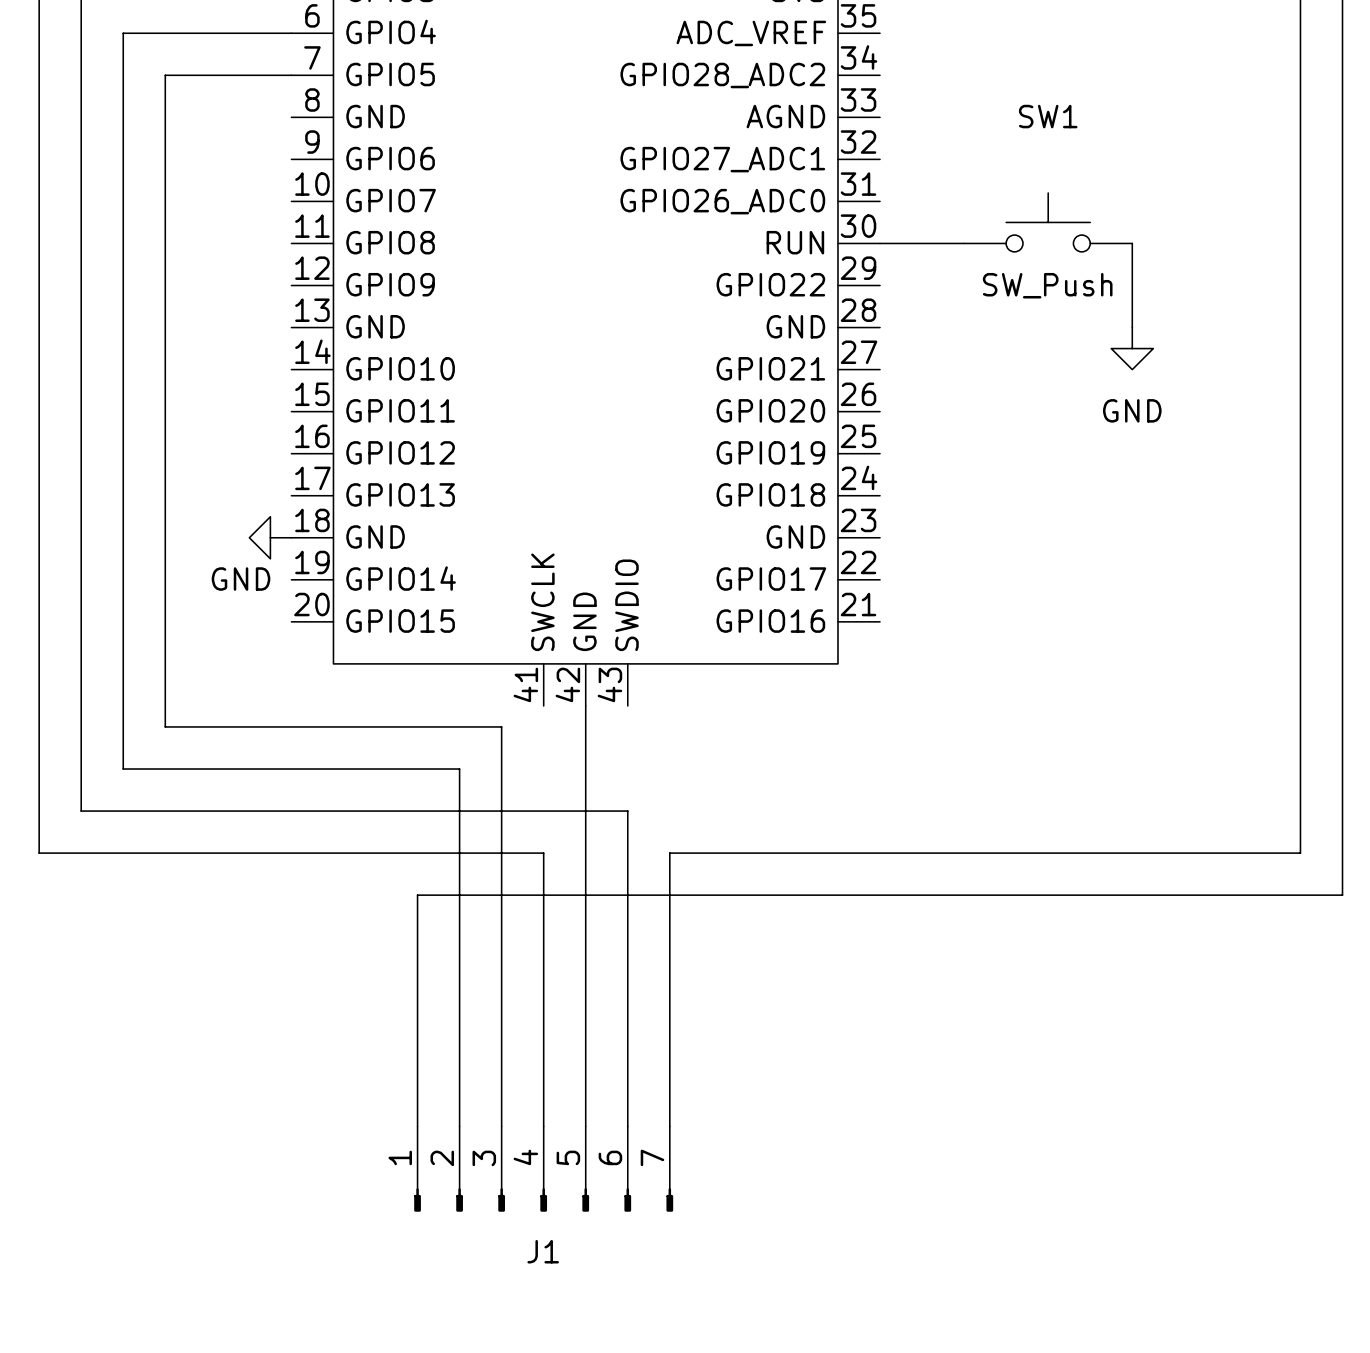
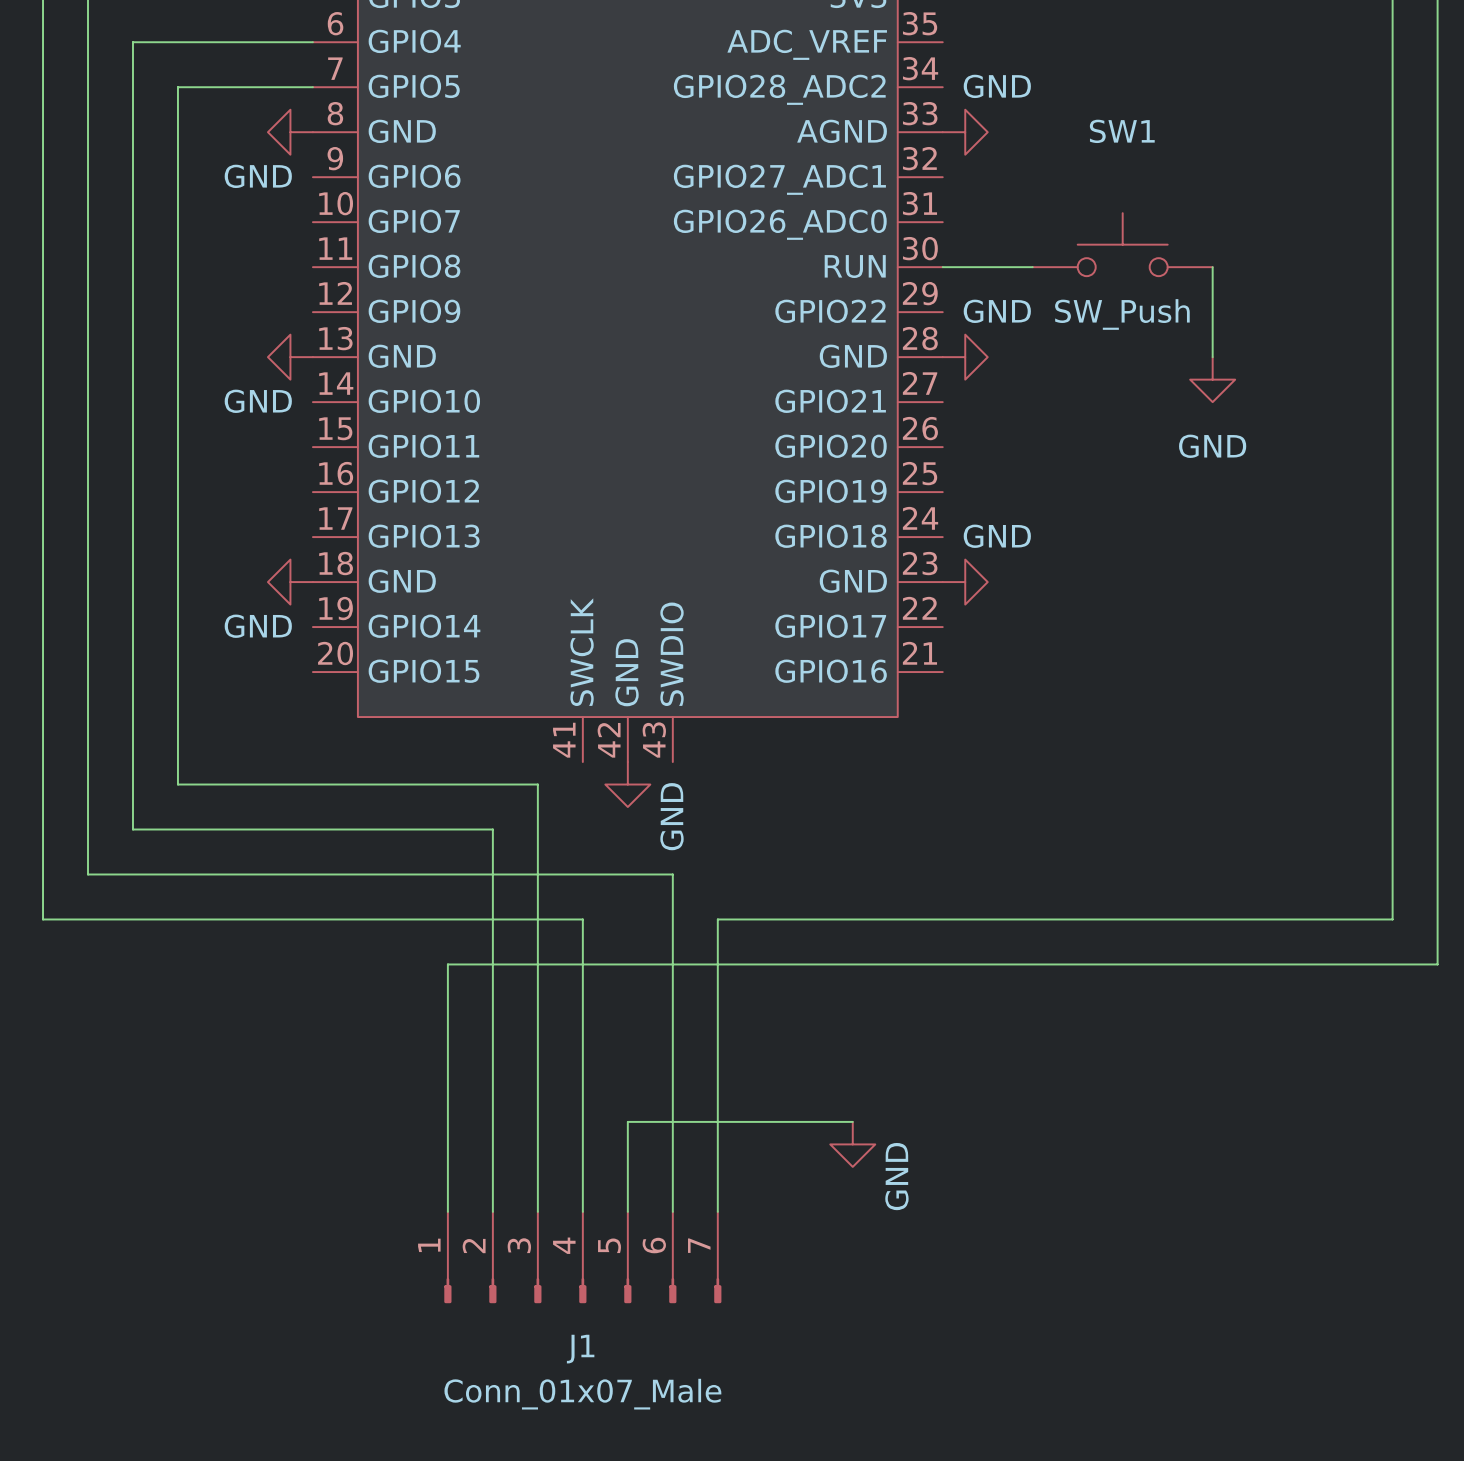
power symbol: none -> GND (290, 132)
power symbol: none -> GND (965, 132)
power symbol: none -> GND (290, 357)
power symbol: none -> GND (965, 357)
power symbol: none -> GND (965, 582)
wire: (585, 705) (585, 1042) -> (852, 1121) (627, 1121)
power symbol: none -> GND (627, 784)
power symbol: none -> GND (852, 1144)
J1 value: none -> Conn_01x07_Male (582, 1394)

